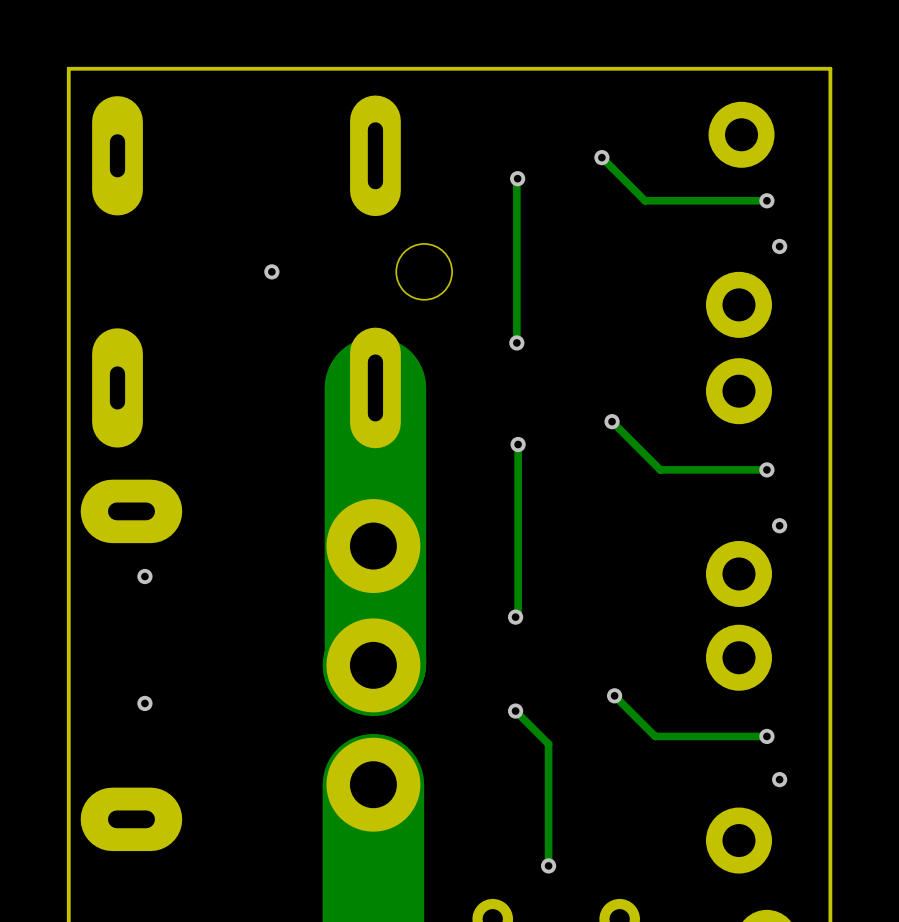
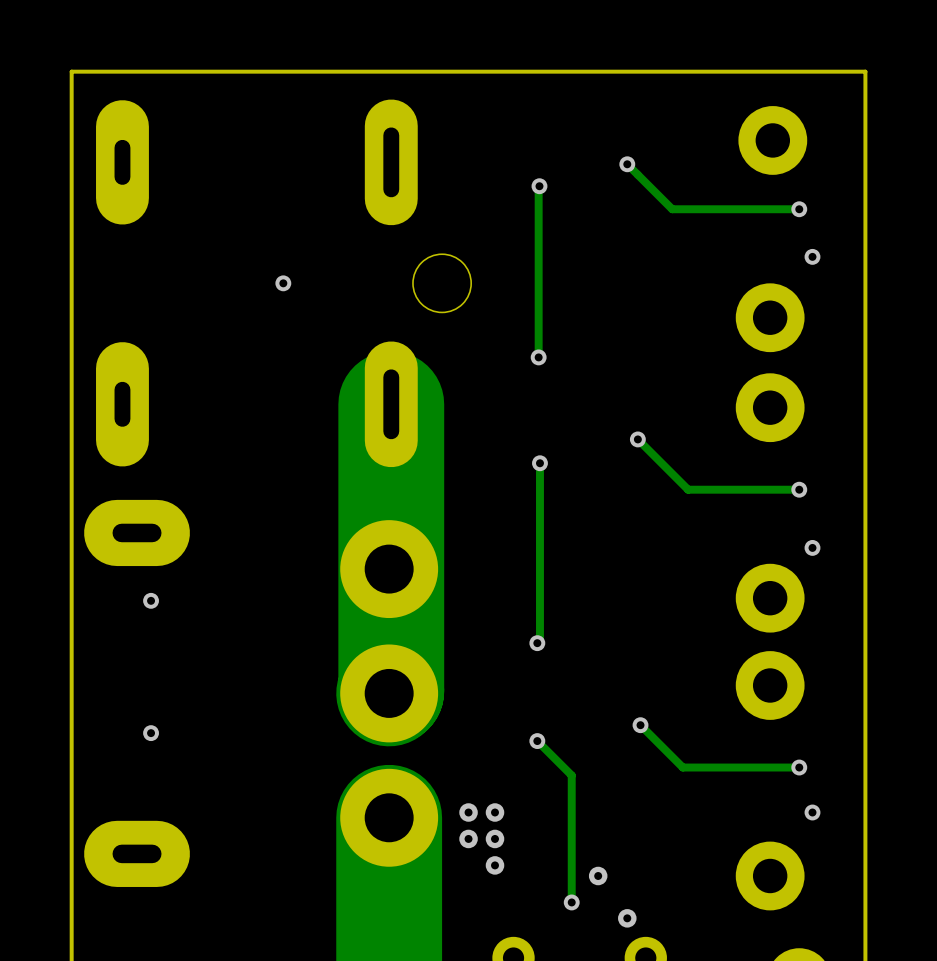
via: none -> (468, 812)
via: none -> (495, 812)
via: none -> (468, 838)
via: none -> (495, 838)
via: none -> (495, 865)
via: none -> (598, 876)
via: none -> (627, 918)

